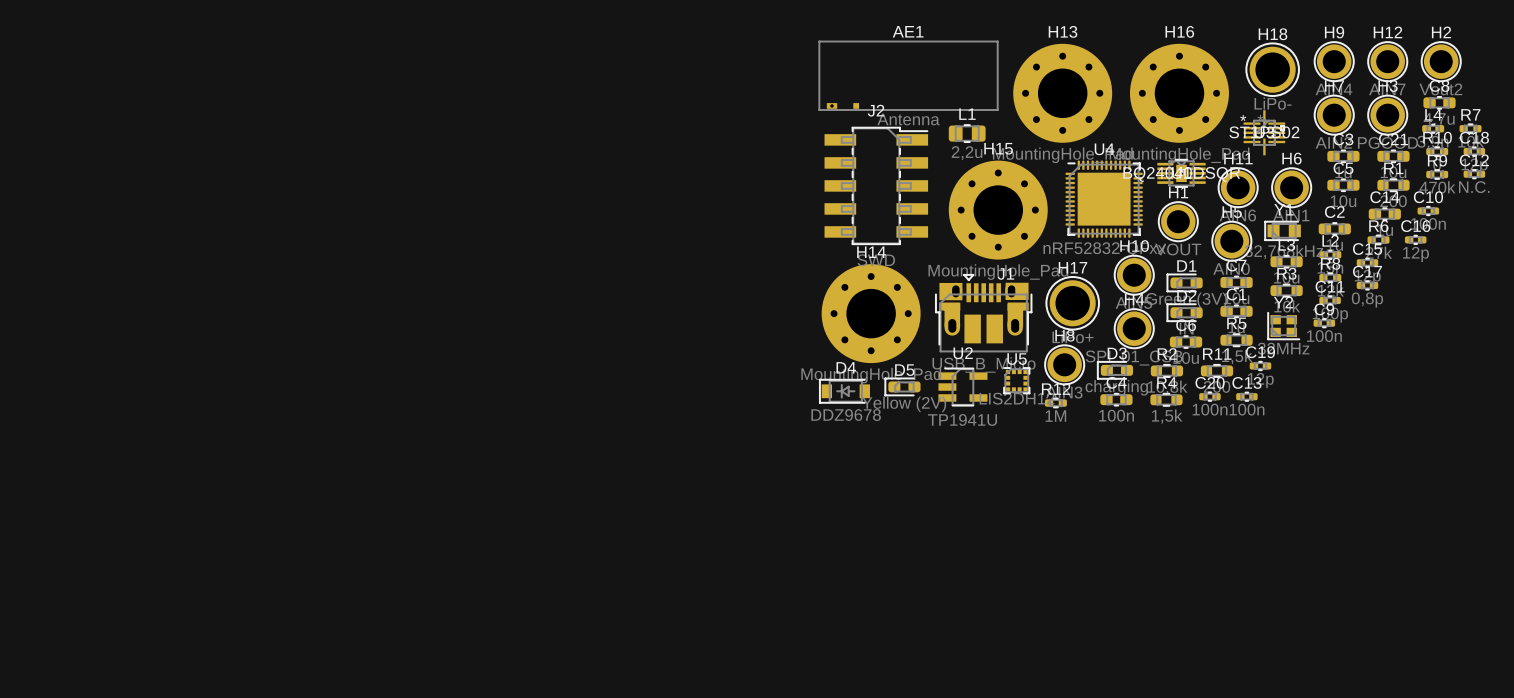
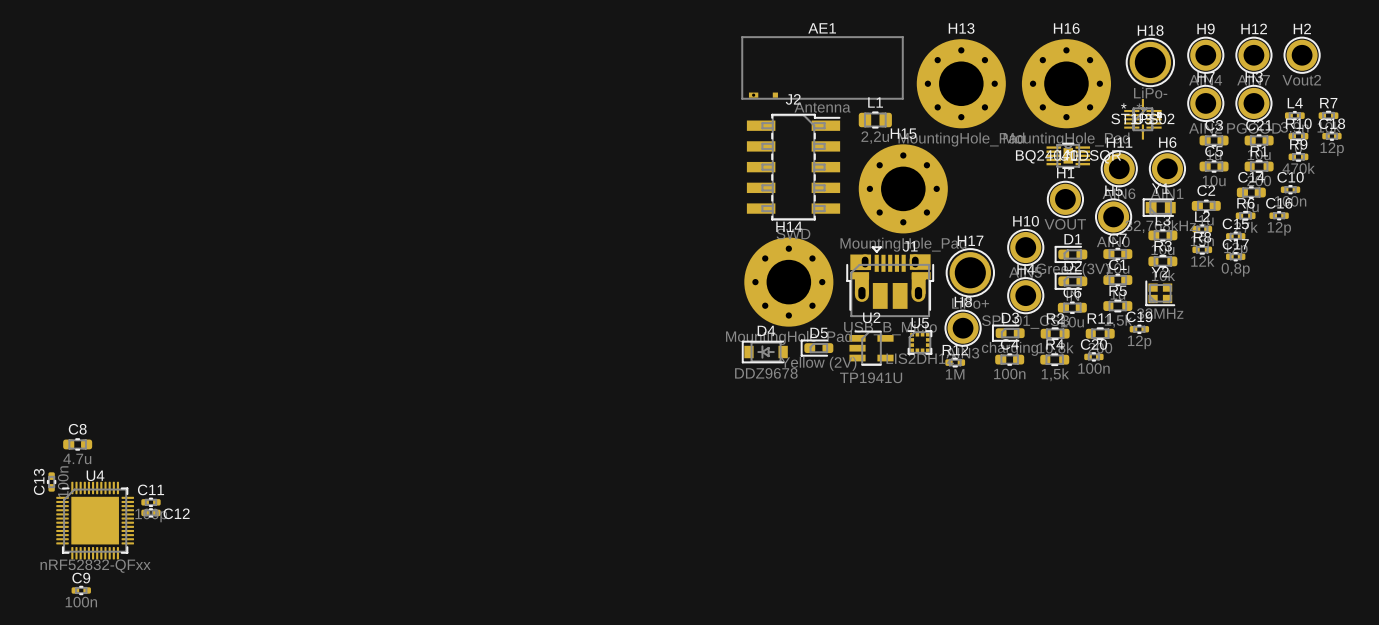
C8 position: (1439, 102) -> (77, 444)
U4 footprint: [1065, 160, 1143, 238] -> [56, 481, 134, 560]
C12 name position: C12 (1474, 160) -> C12 (176, 513)
C12 position: (1474, 174) -> (150, 512)
C12 value: N.C. (1474, 187) -> none
C11 position: (1330, 300) -> (150, 502)
C9 position: (1324, 323) -> (81, 590)
C13 rotation: 0° (1246, 396) -> 90° clockwise (51, 481)
C13 position: (1246, 396) -> (51, 481)

